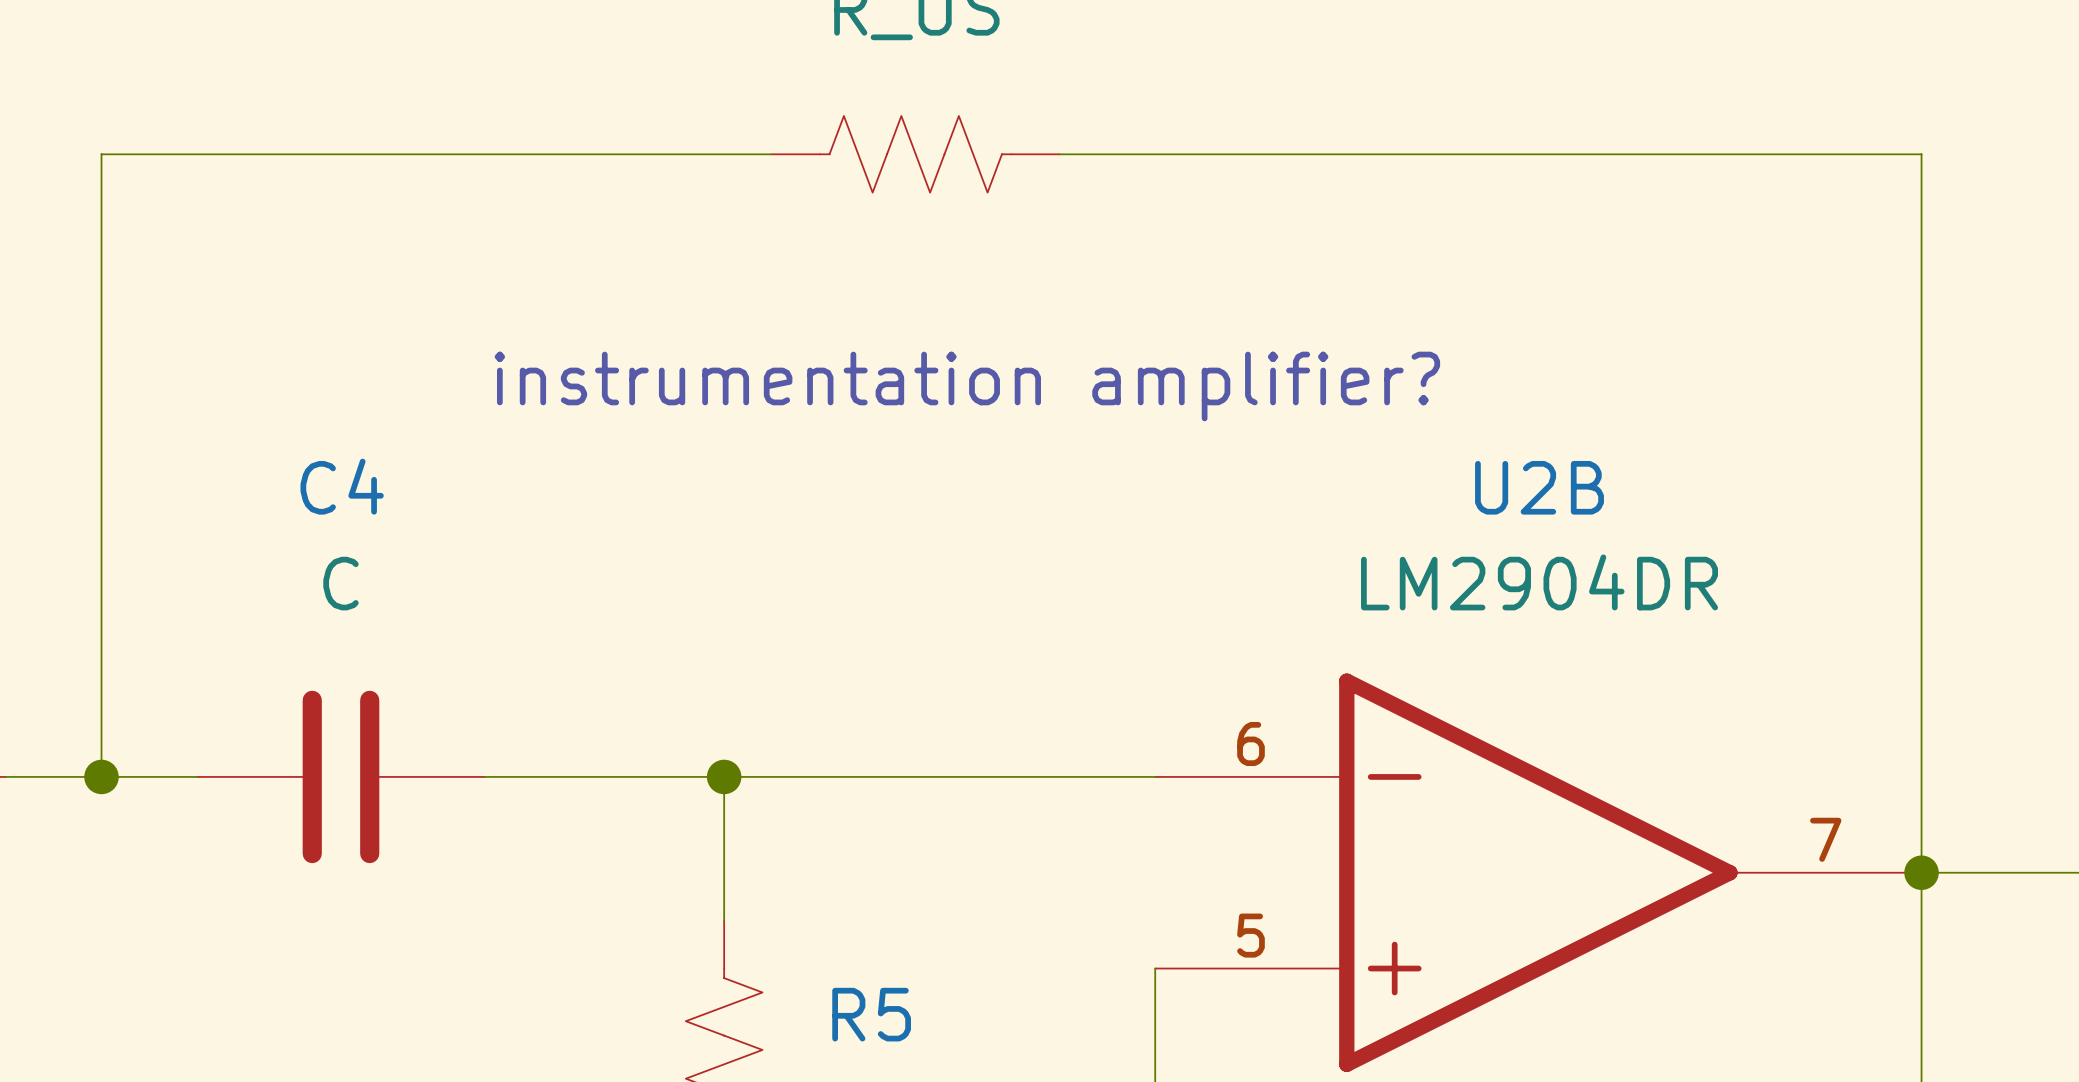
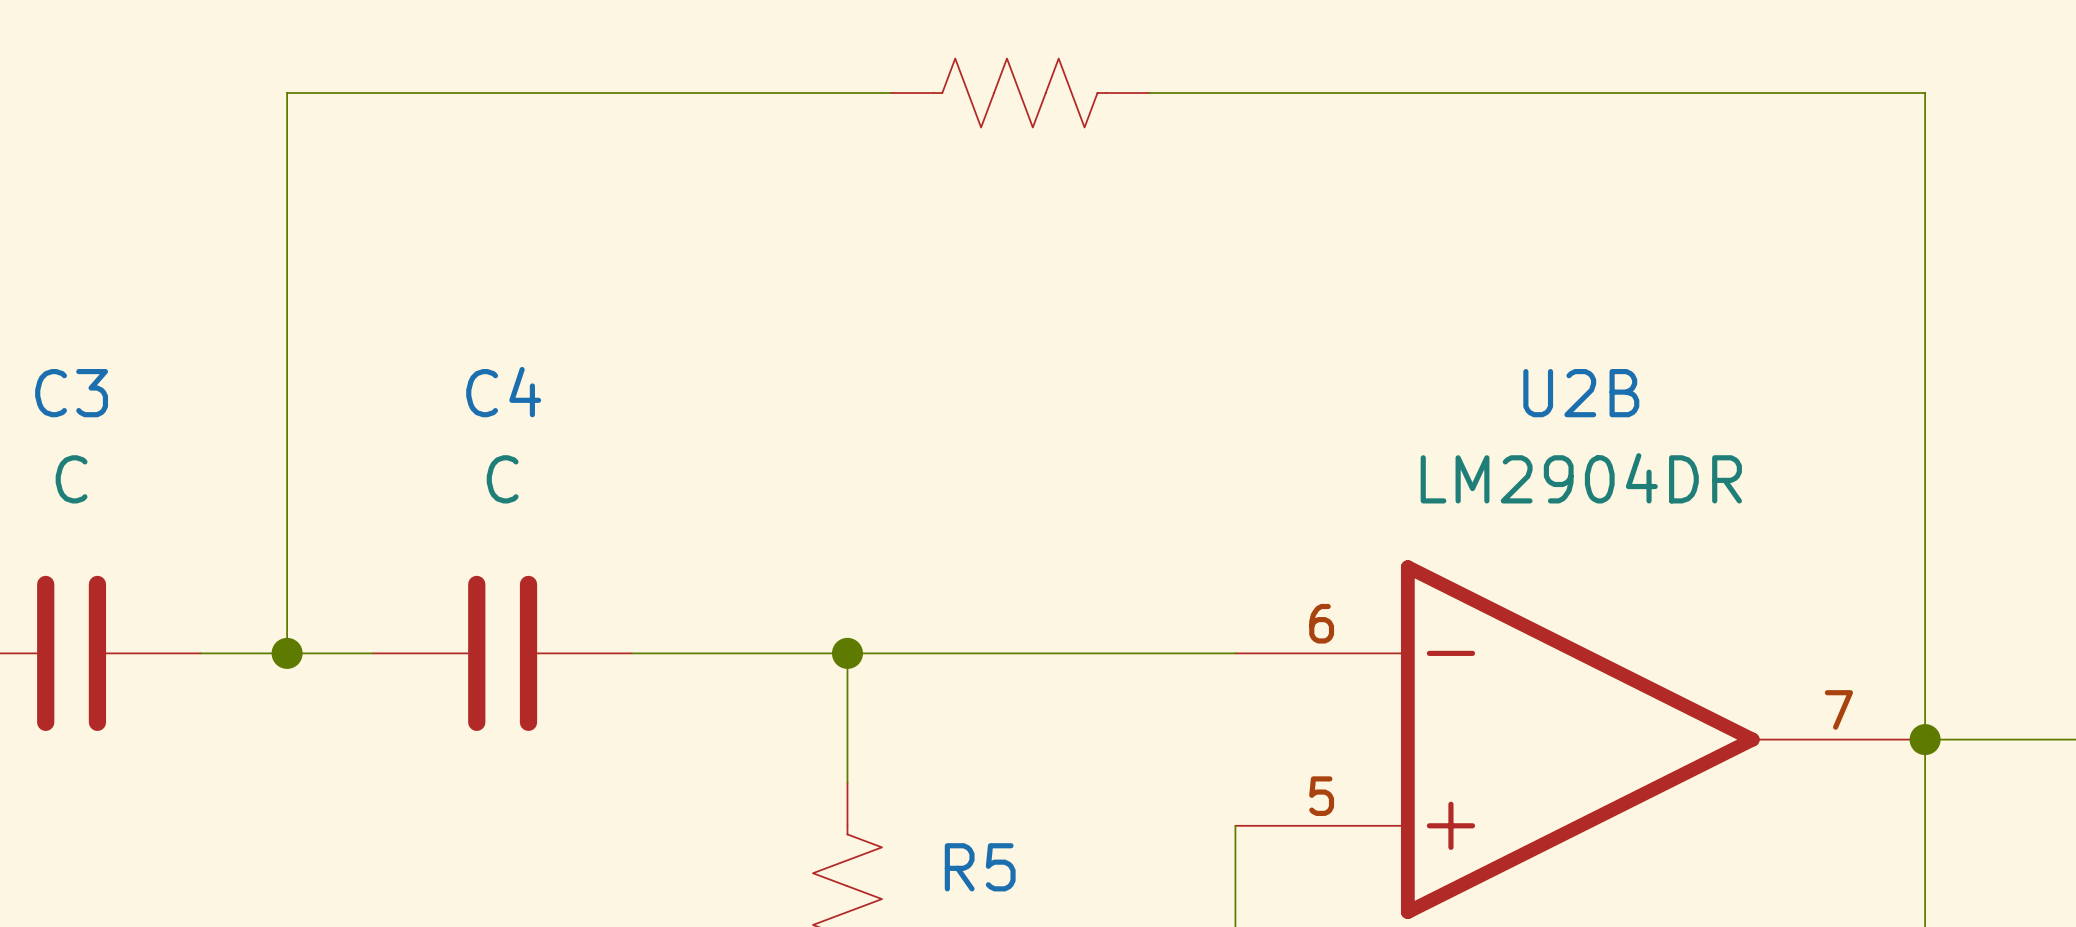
text: instrumentation amplifier? (967, 386) -> none

